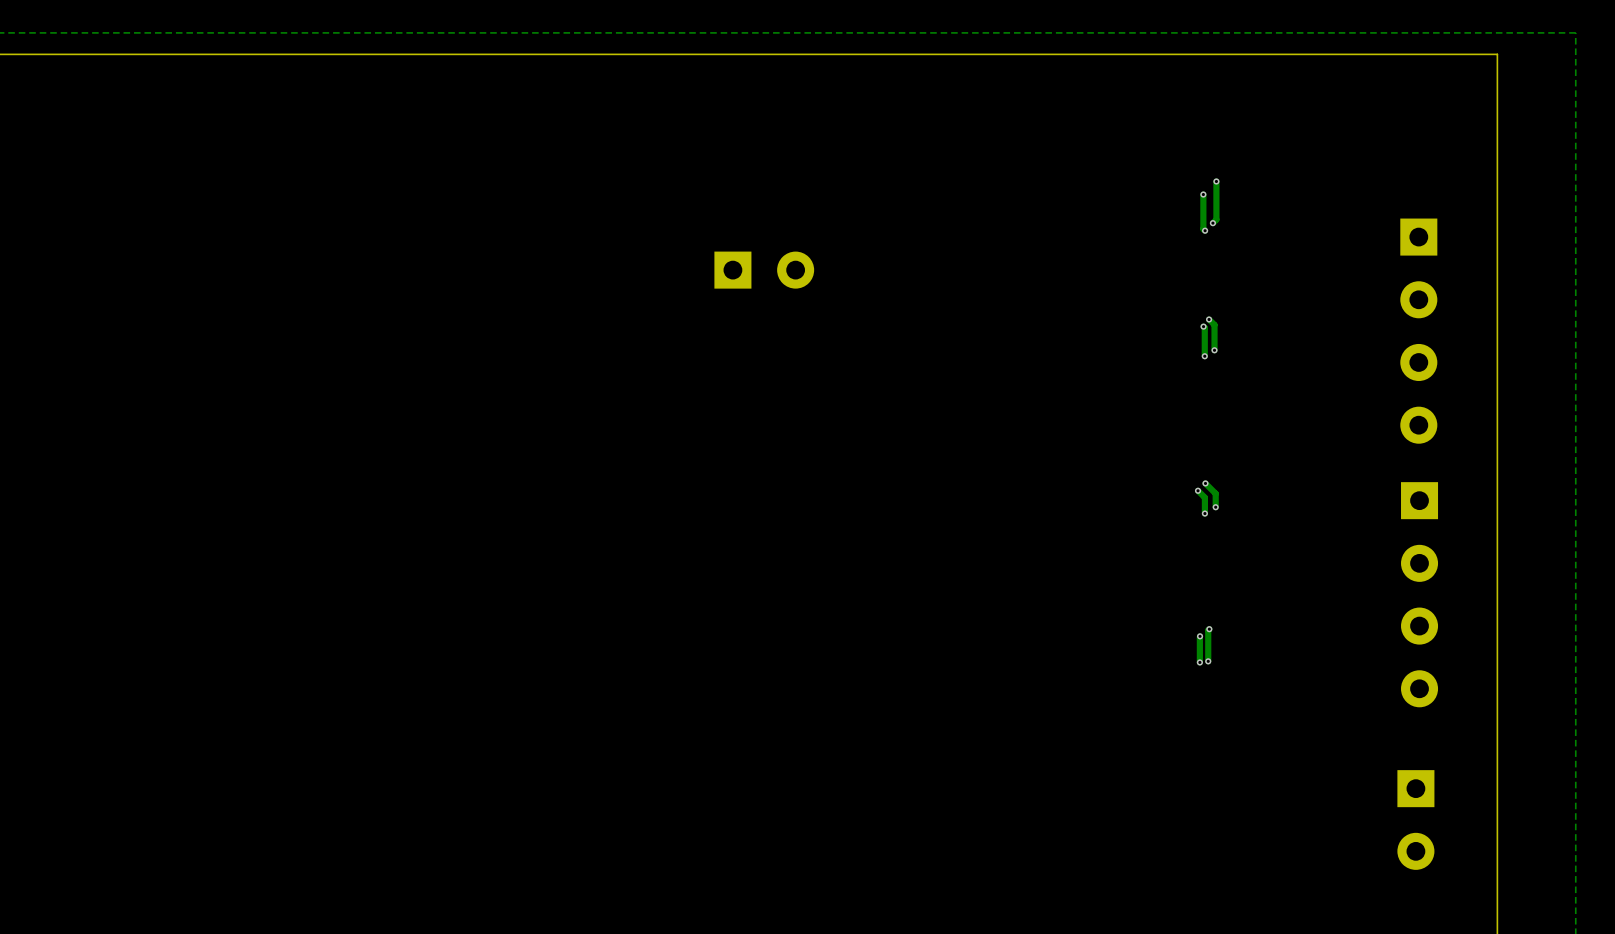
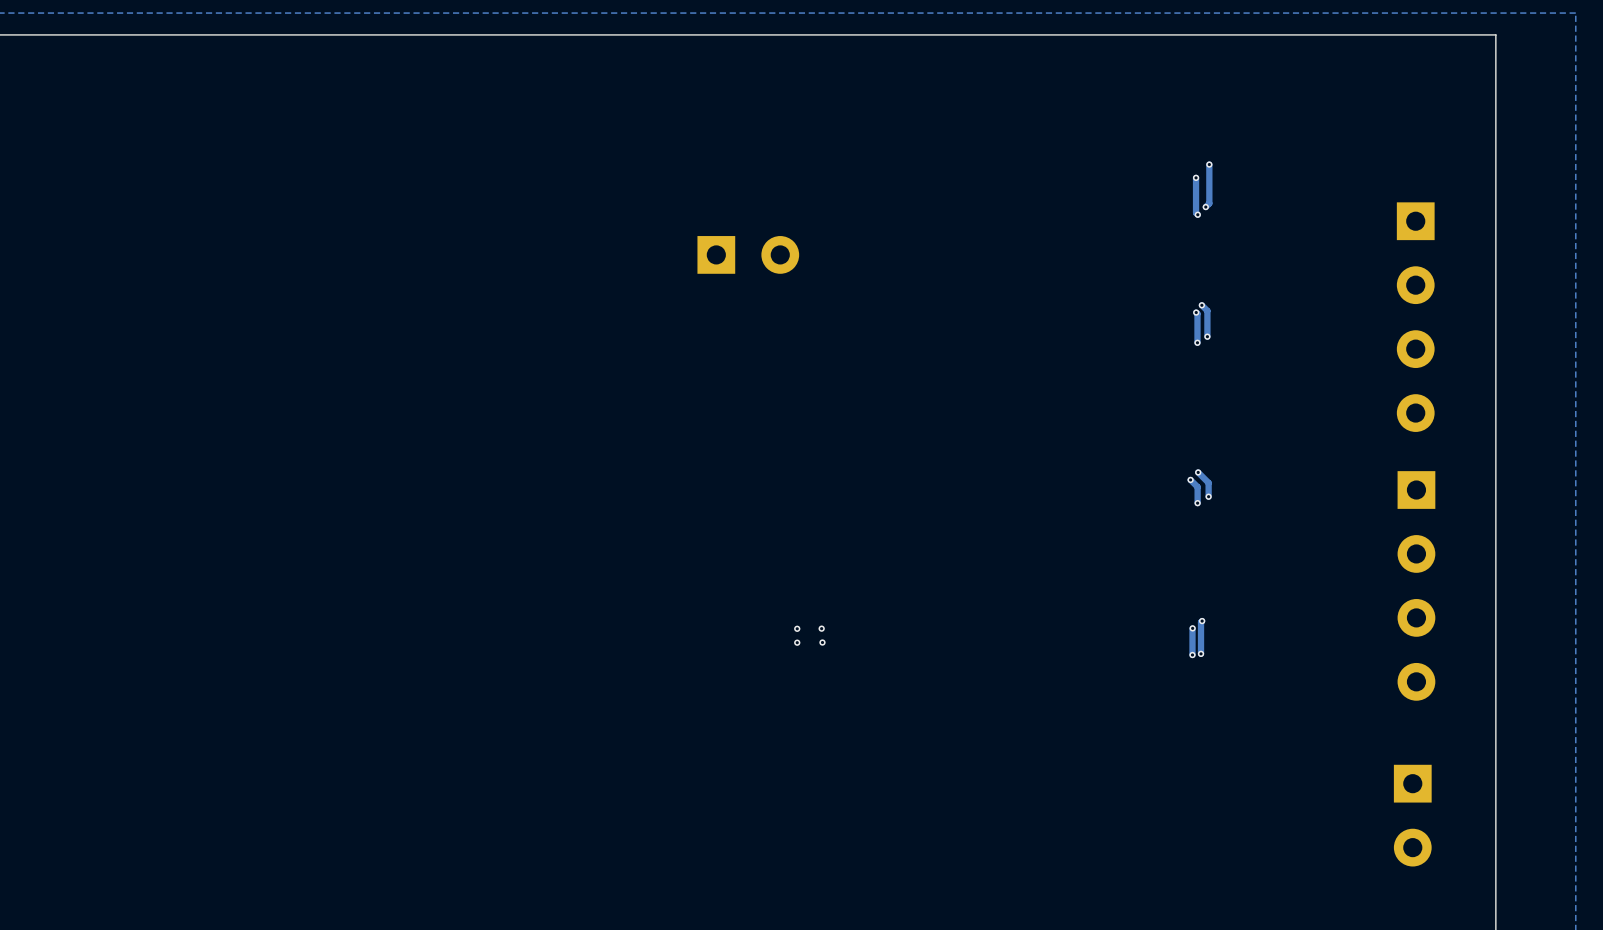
via: none -> (797, 628)
via: none -> (821, 628)
via: none -> (797, 642)
via: none -> (822, 642)

